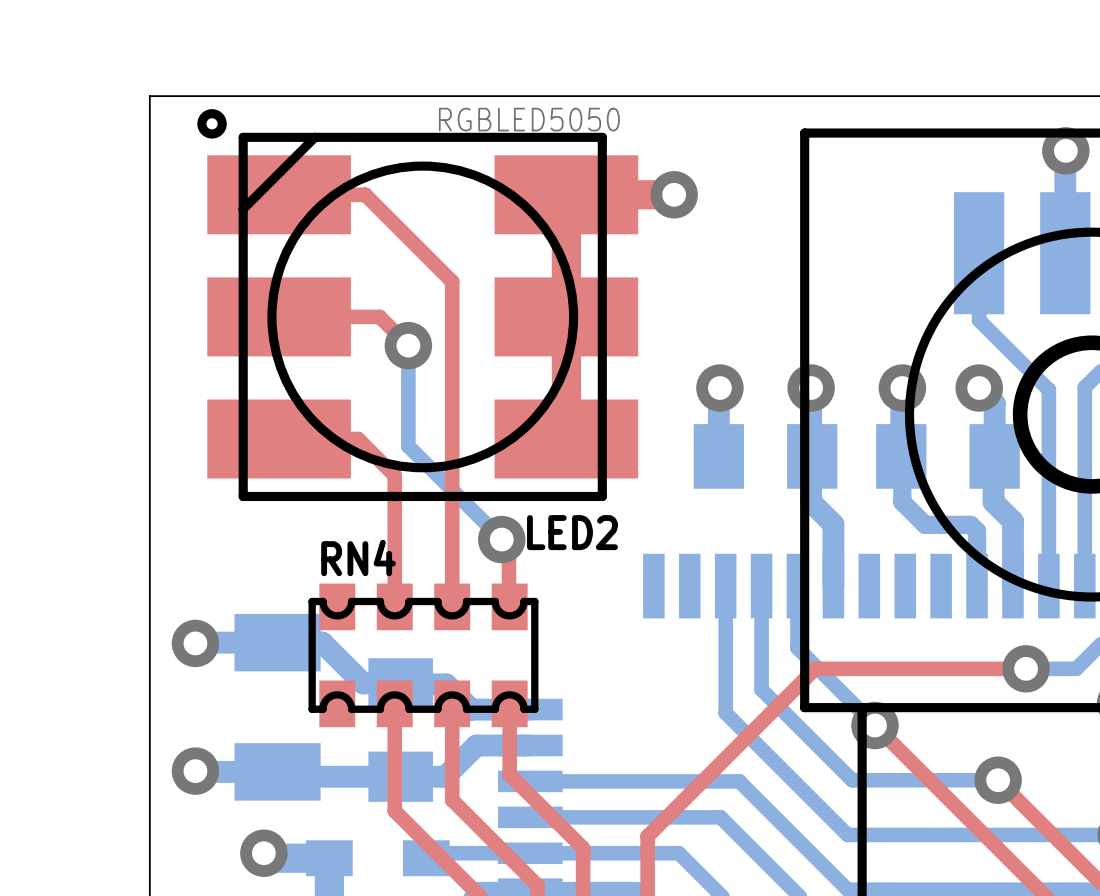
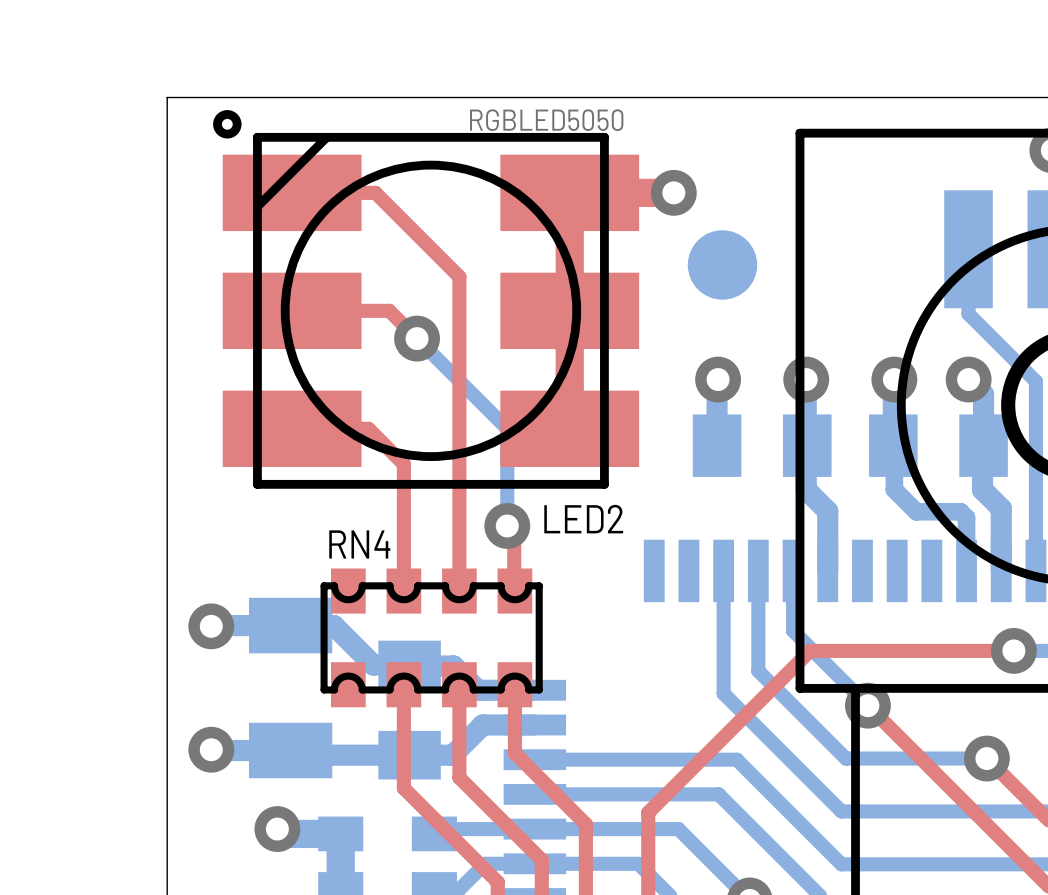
part: none -> (722, 264)
bottom track: (408, 345) (408, 446) (501, 539) -> (417, 338) (507, 428) (507, 525)

